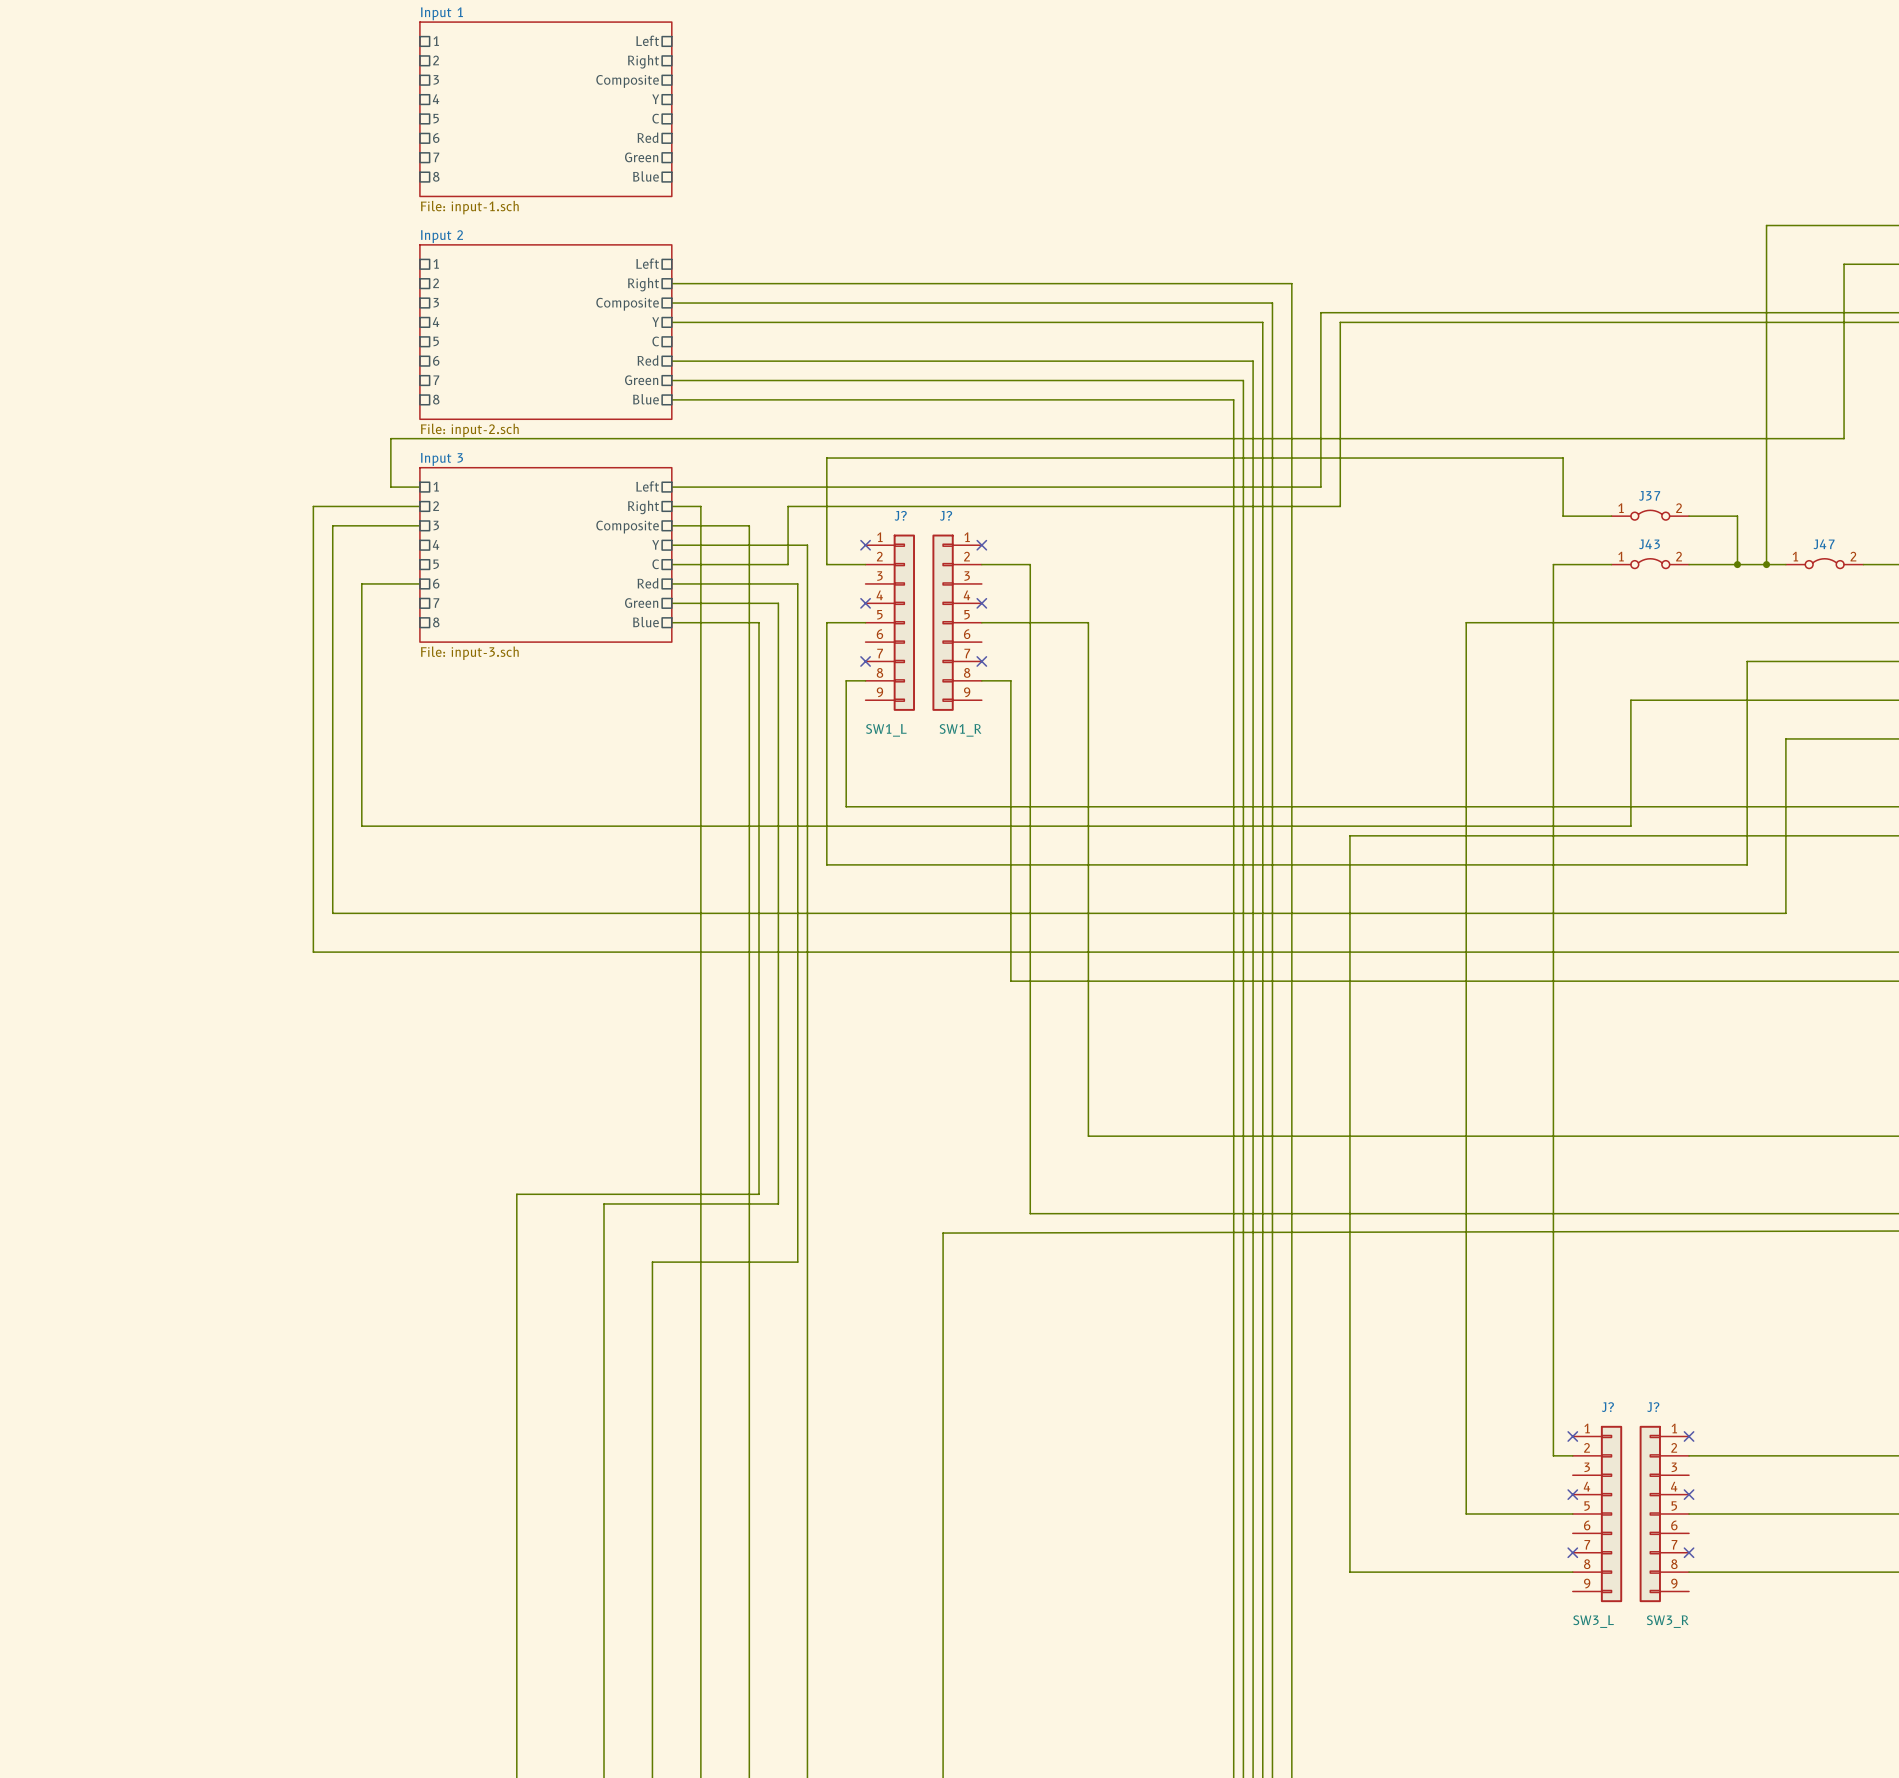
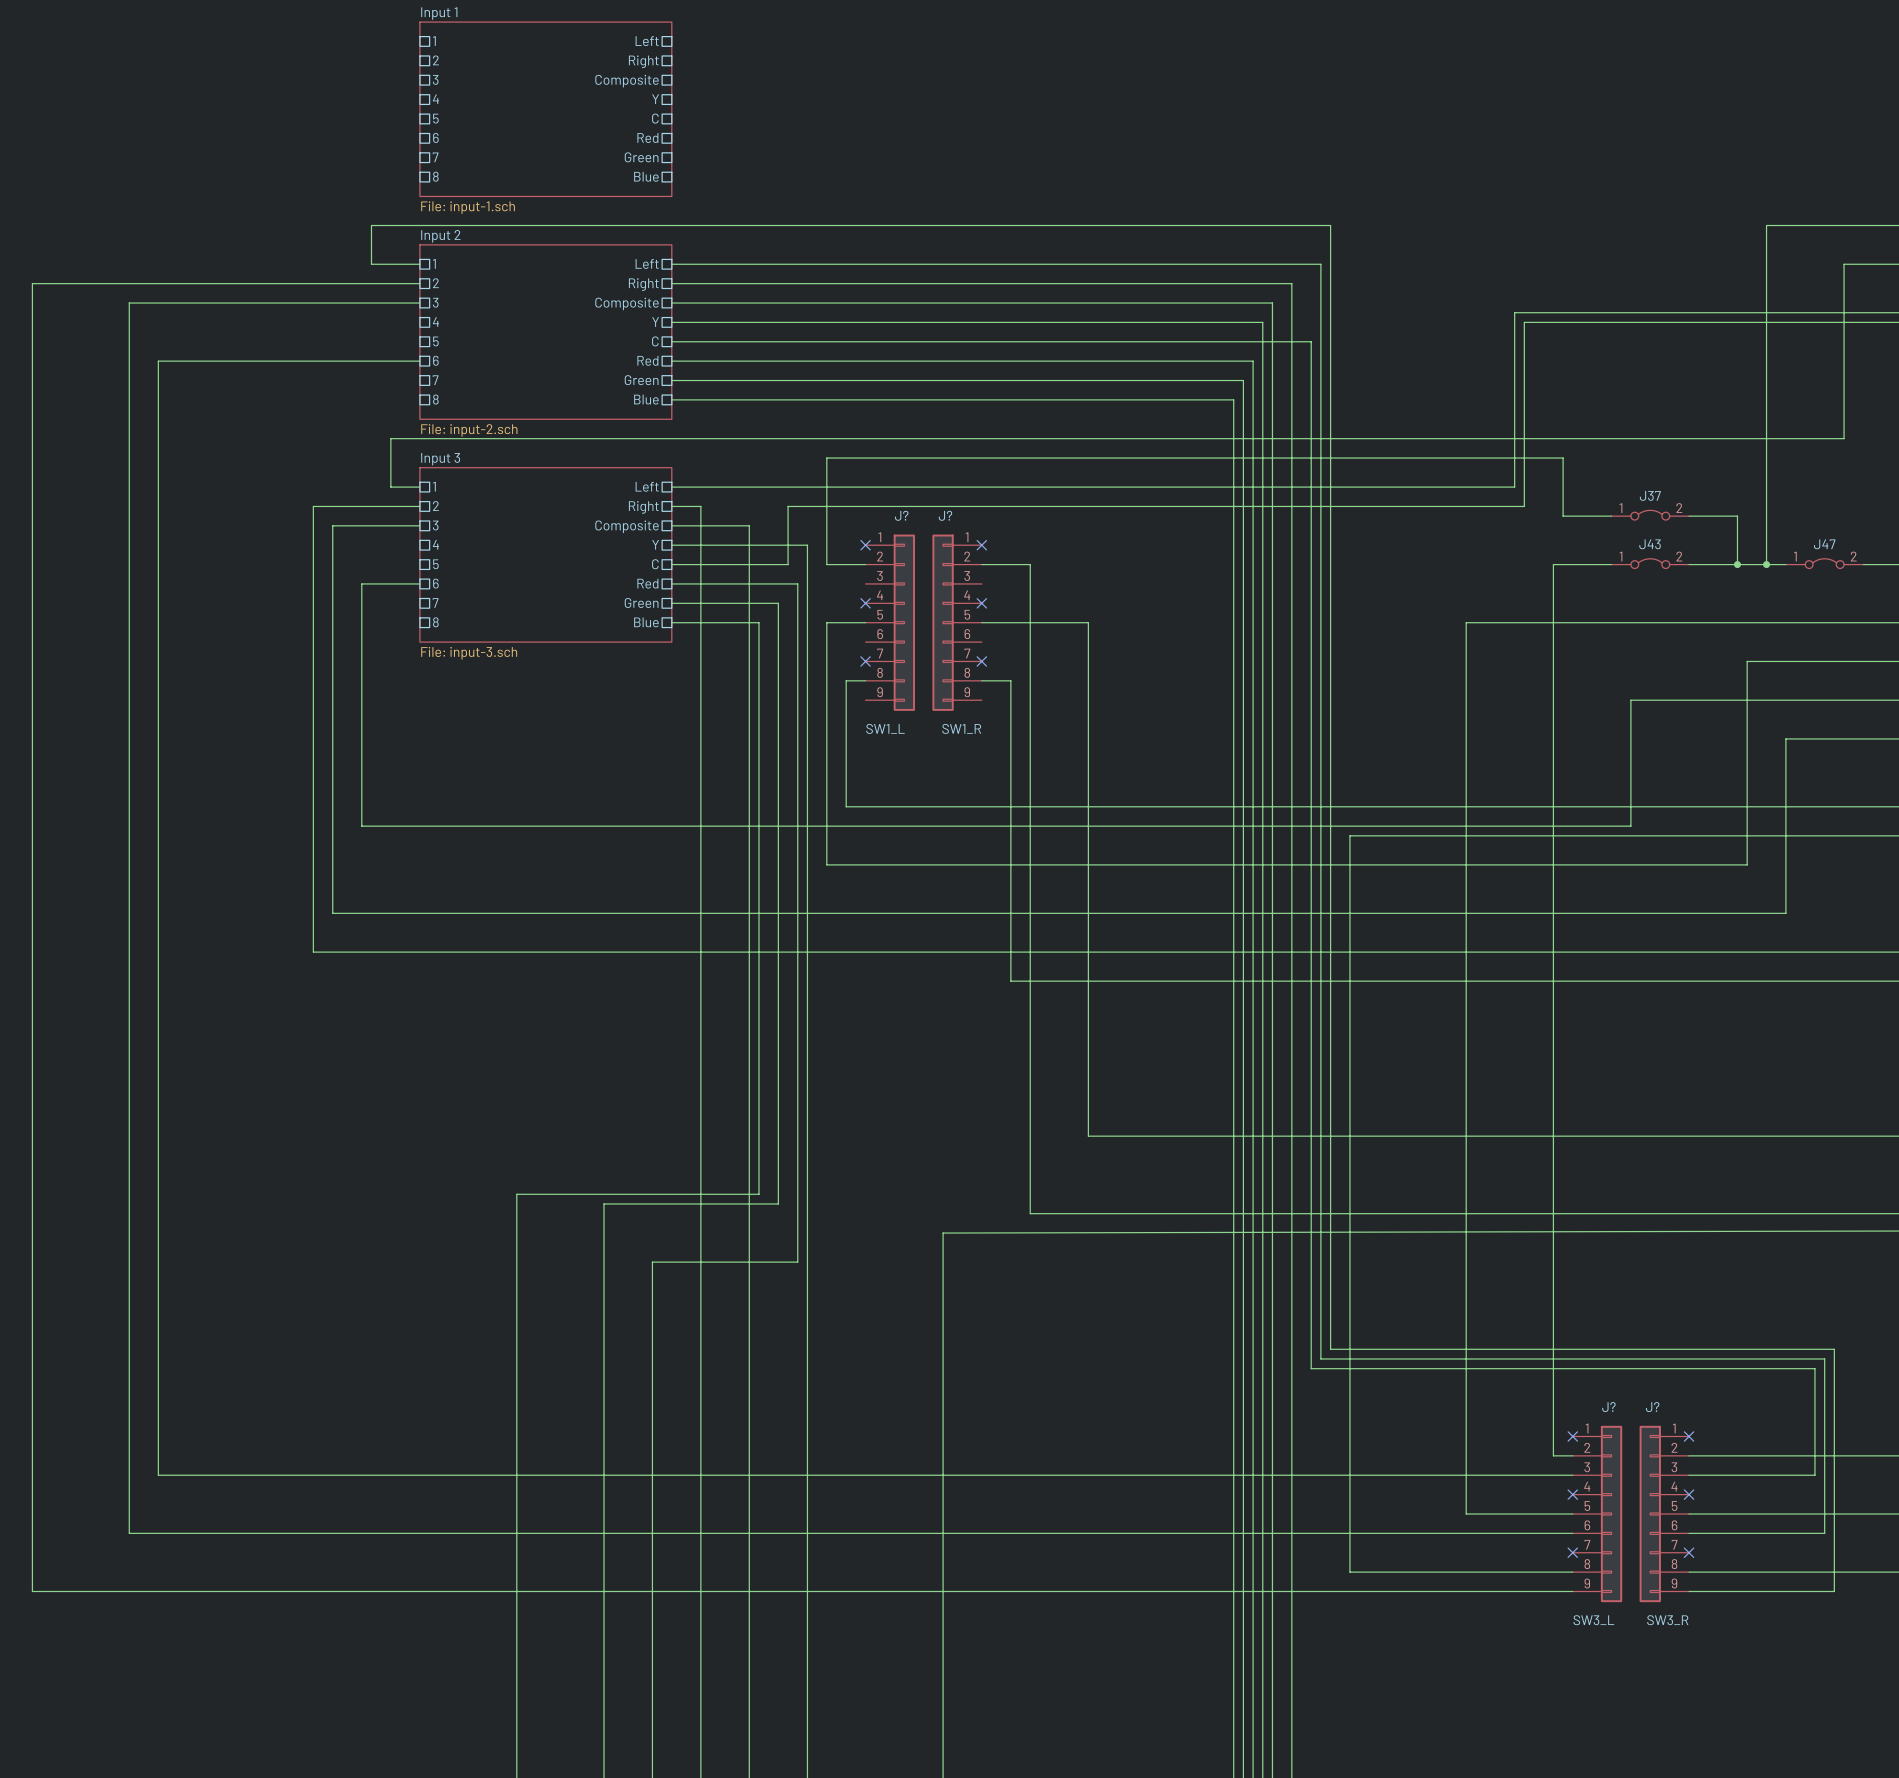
wire: none -> (419, 264) (371, 264) (371, 225) (1330, 225) (1330, 1349) (1834, 1349) (1834, 1591) (1689, 1591)
wire: none -> (419, 283) (32, 283) (32, 1591) (1572, 1591)
wire: none -> (419, 303) (129, 303) (129, 1533) (1572, 1533)
wire: (1320, 312) (1514, 312) -> (1320, 312) (1320, 264) (671, 264)
wire: none -> (1514, 312) (1514, 487) (1320, 487) (1320, 1358) (1824, 1358) (1824, 1533) (1689, 1533)
wire: (1524, 322) (1340, 322) (1340, 506) -> (1524, 322) (1524, 506) (1340, 506)
wire: none -> (671, 341) (1311, 341) (1311, 1368) (1814, 1368) (1814, 1475) (1689, 1475)
wire: none -> (419, 361) (158, 361) (158, 1475) (1572, 1475)

